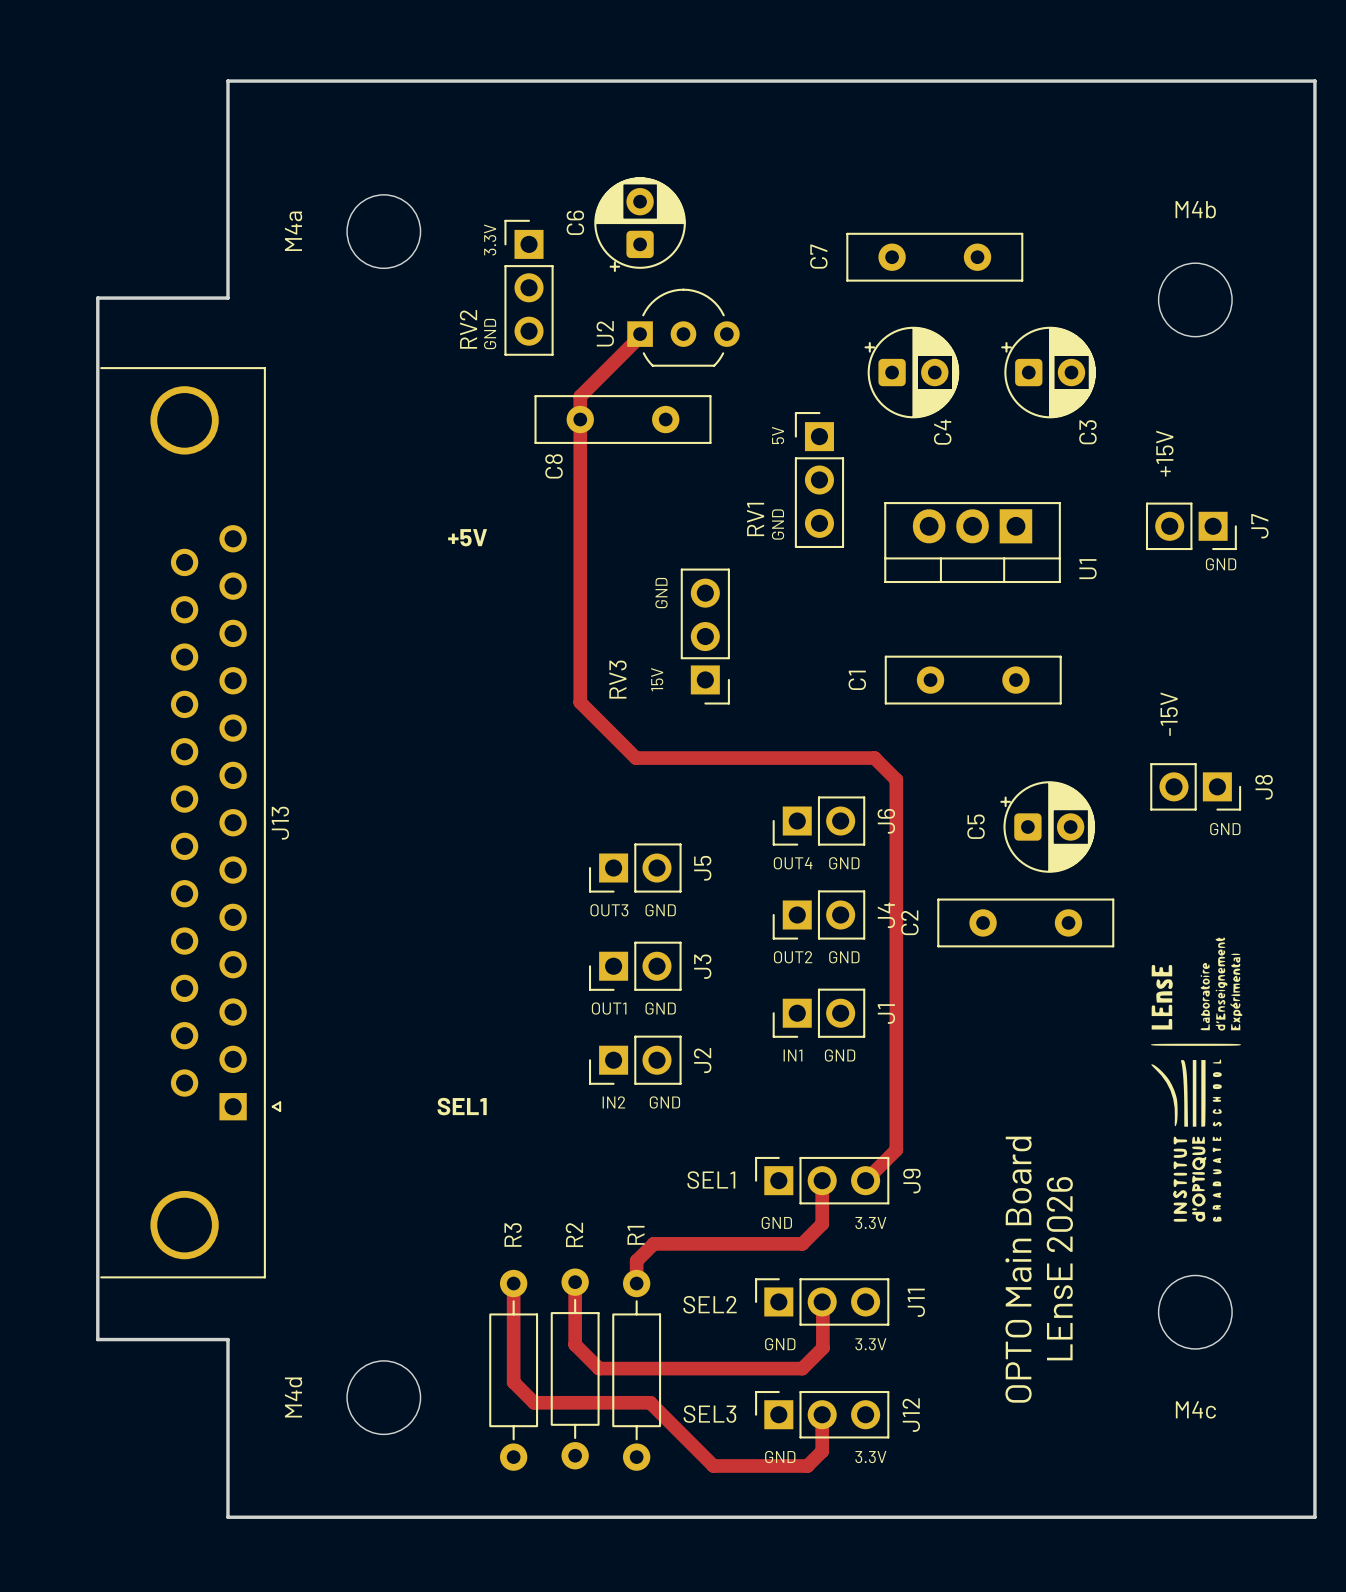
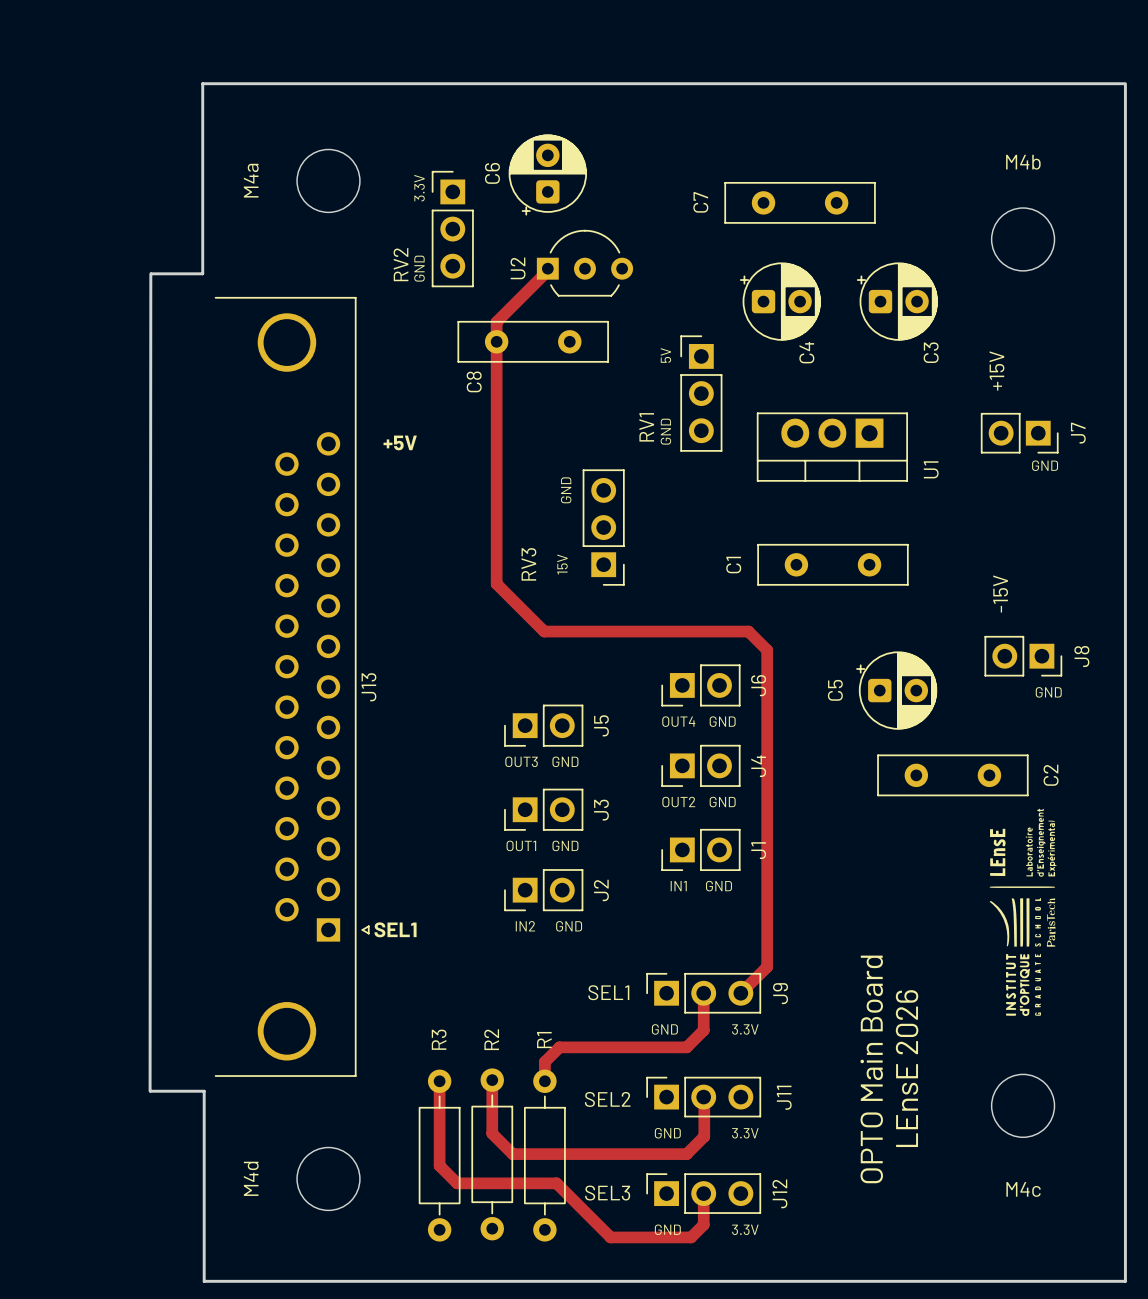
board edge: none -> (1123, 83) (202, 83) (202, 273) (151, 273)
board edge: (1314, 117) (1314, 81) (227, 81) (227, 298) (97, 298) (97, 1339) (227, 1339) (227, 1517) (238, 1517) -> (150, 1091) (204, 1091) (204, 1281)
board edge: none -> (150, 273) (150, 1091)
J13 position: (190, 822) -> (292, 686)
C2 name position: C2 (909, 922) -> C2 (1051, 775)
C2 position: (1025, 922) -> (952, 775)
drawing shape: [1150, 937, 1243, 1222] -> [989, 808, 1057, 1017]

